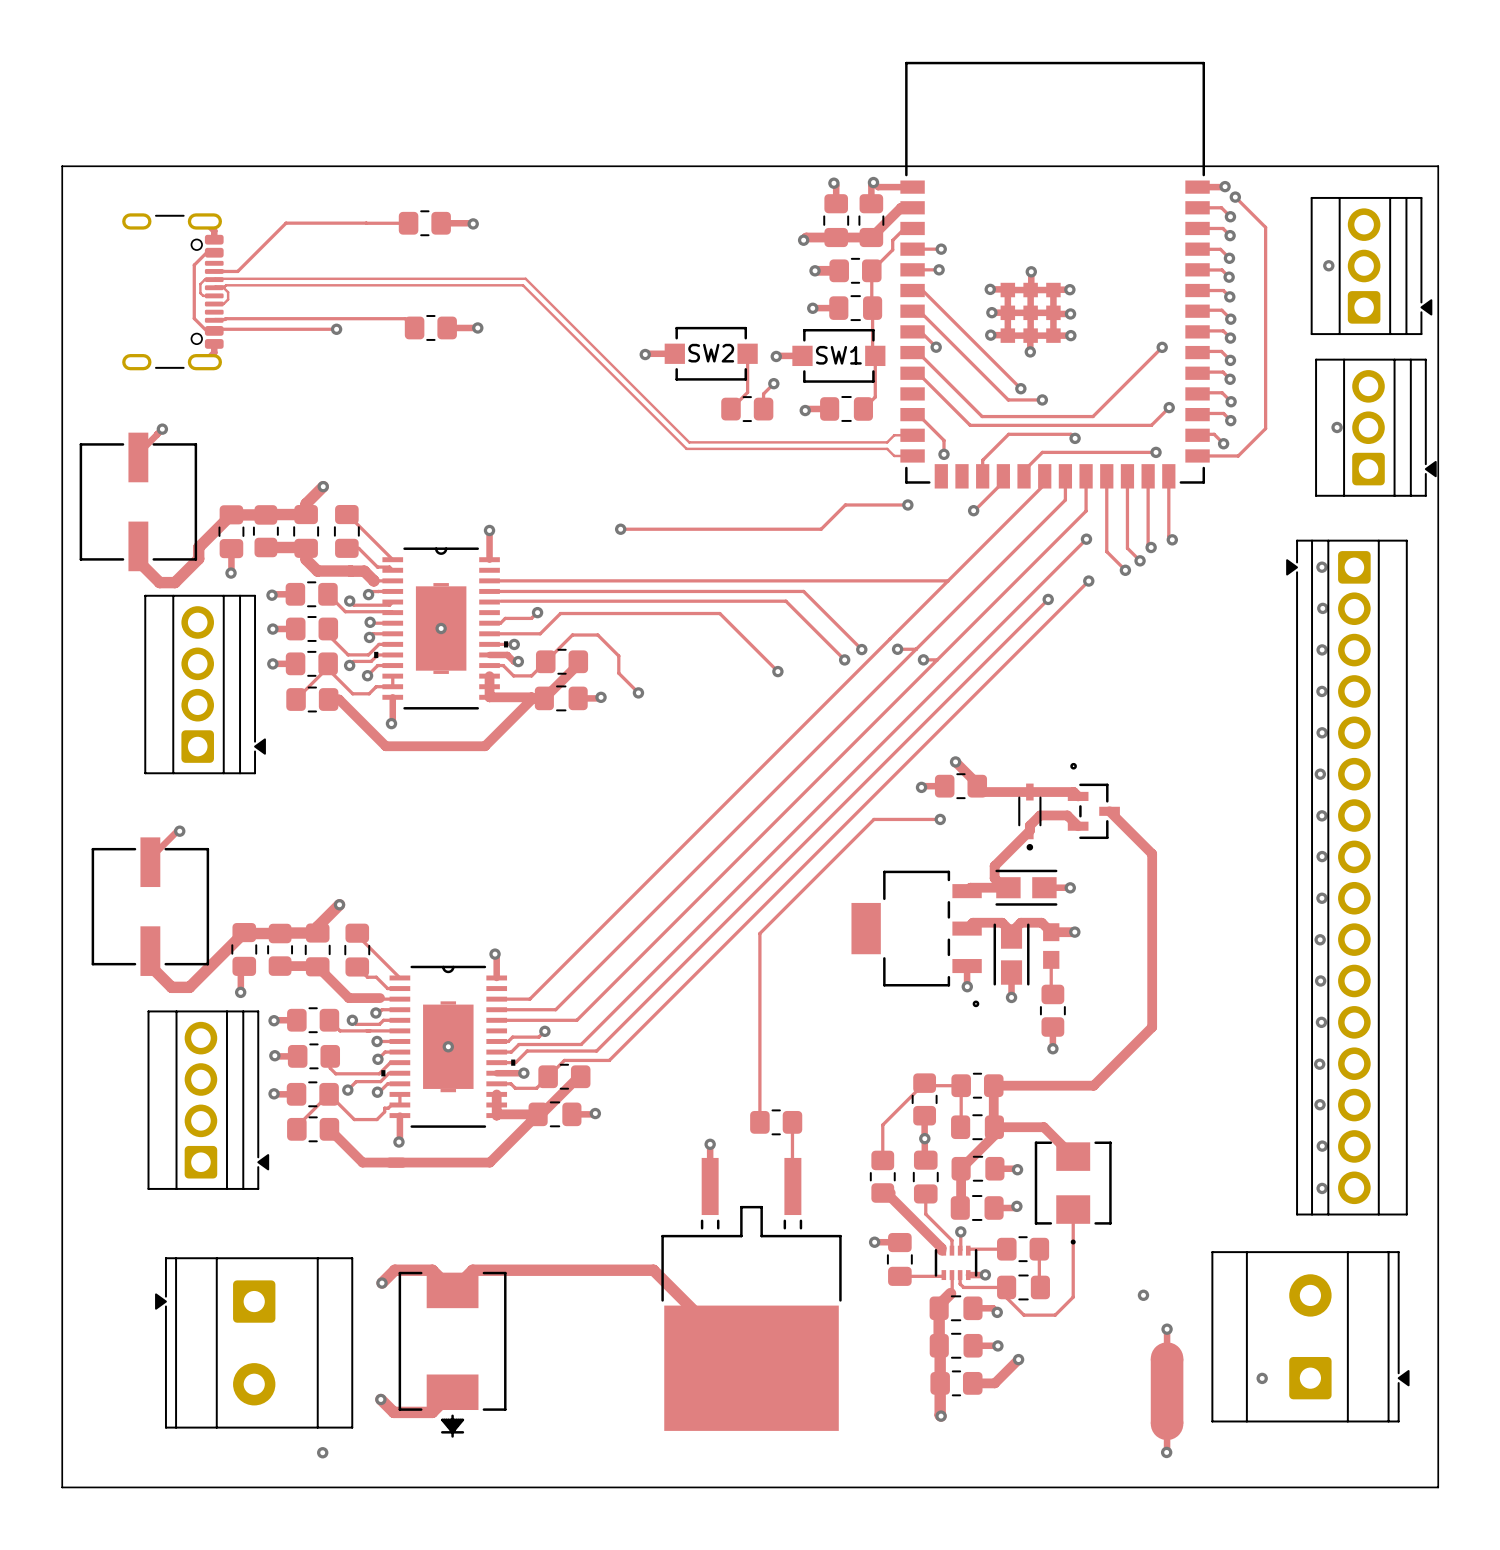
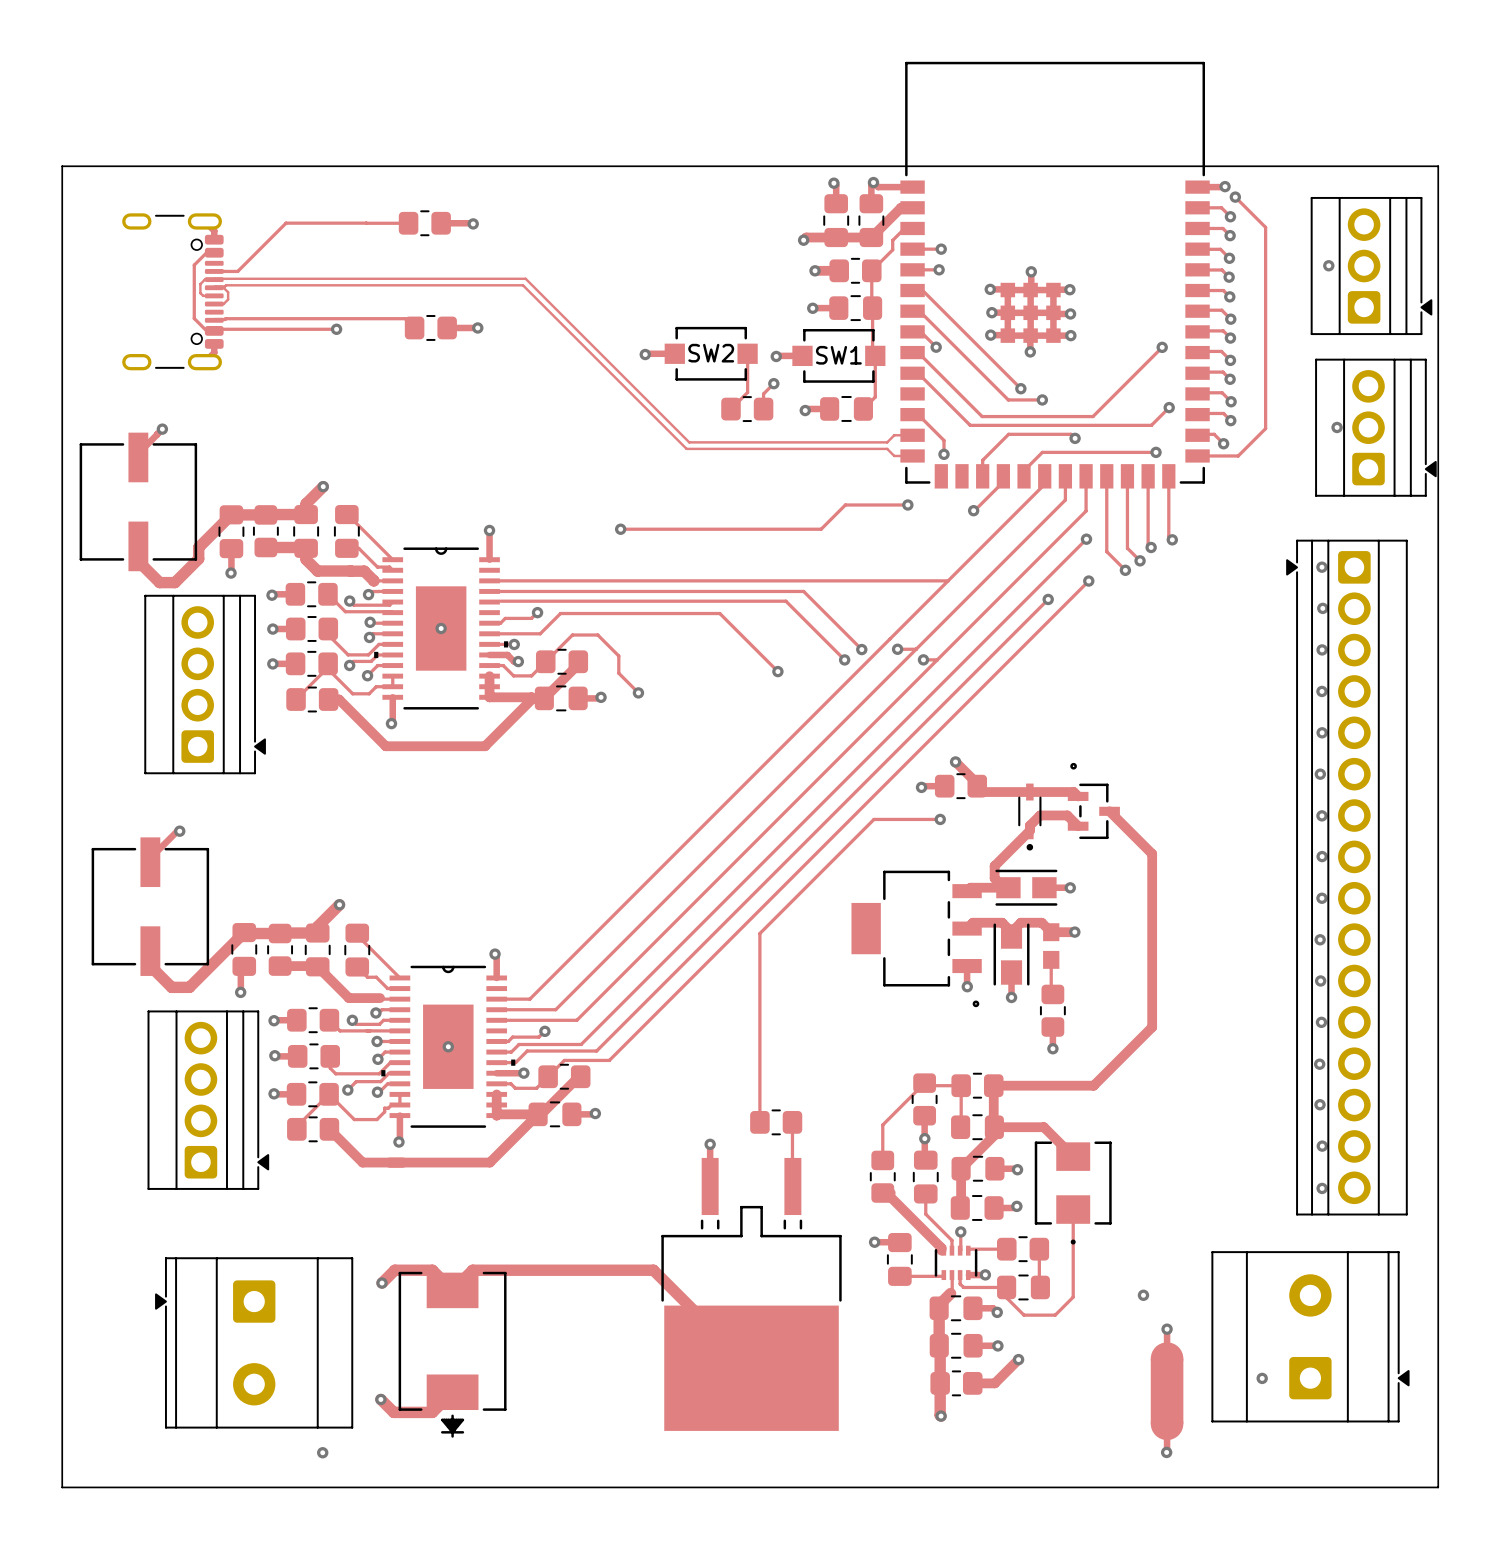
part footprint: [374, 547, 509, 710] -> [374, 547, 509, 710]
part footprint: [381, 965, 516, 1128] -> [381, 965, 516, 1128]

